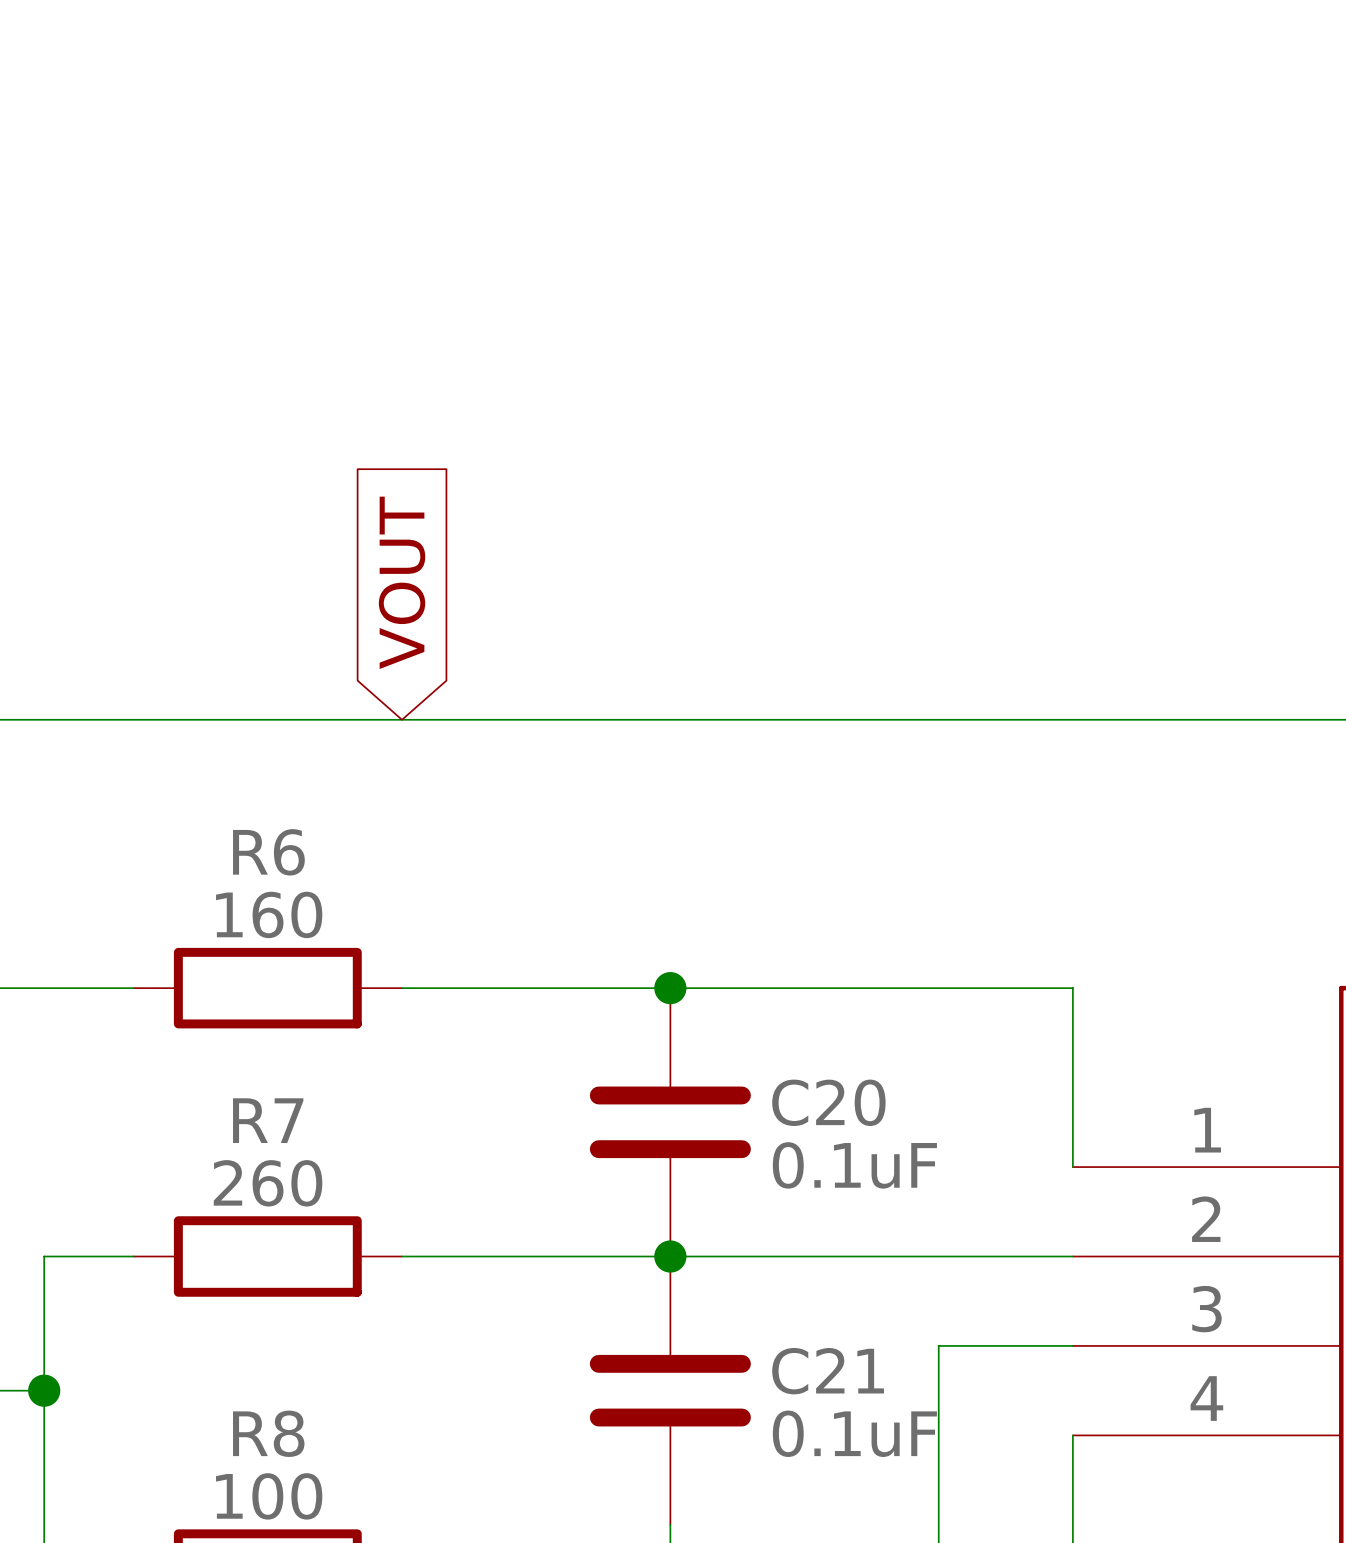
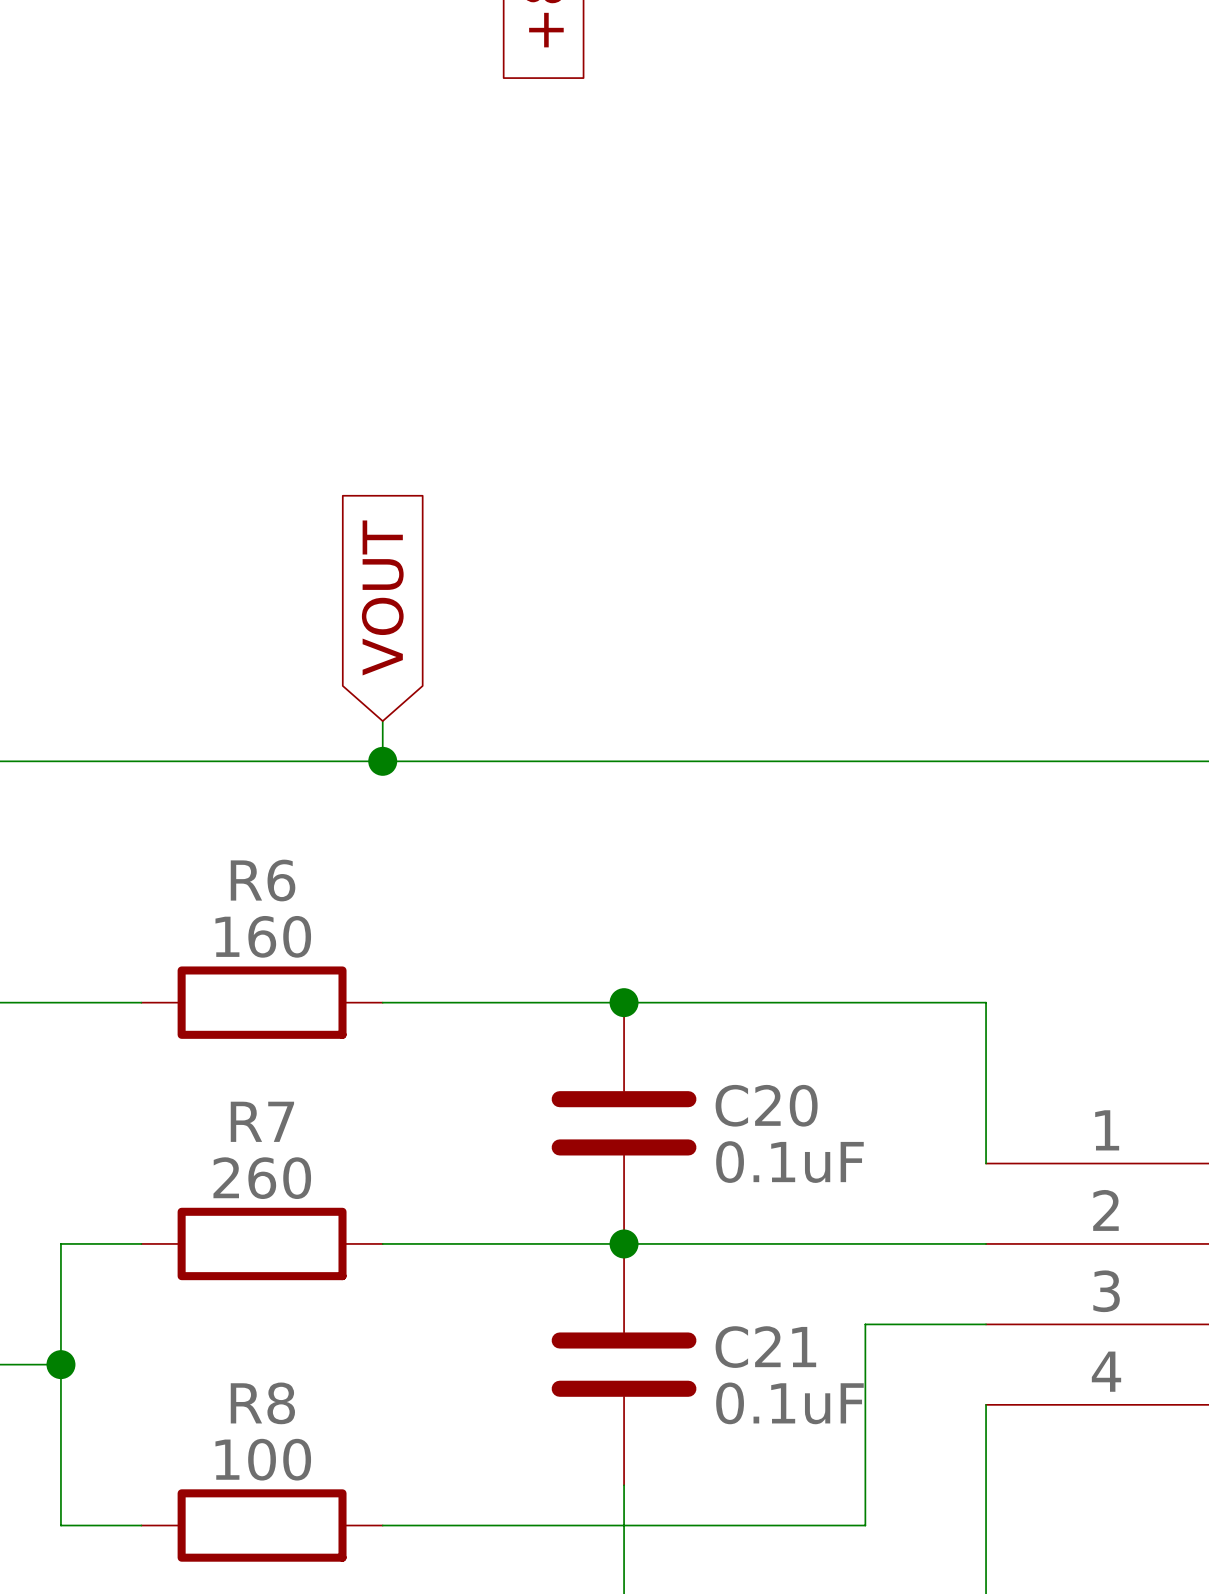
global label position: VOUT (402, 582) -> VOUT (382, 597)
wire: none -> (382, 721) (382, 761)
junction: none -> (382, 761)

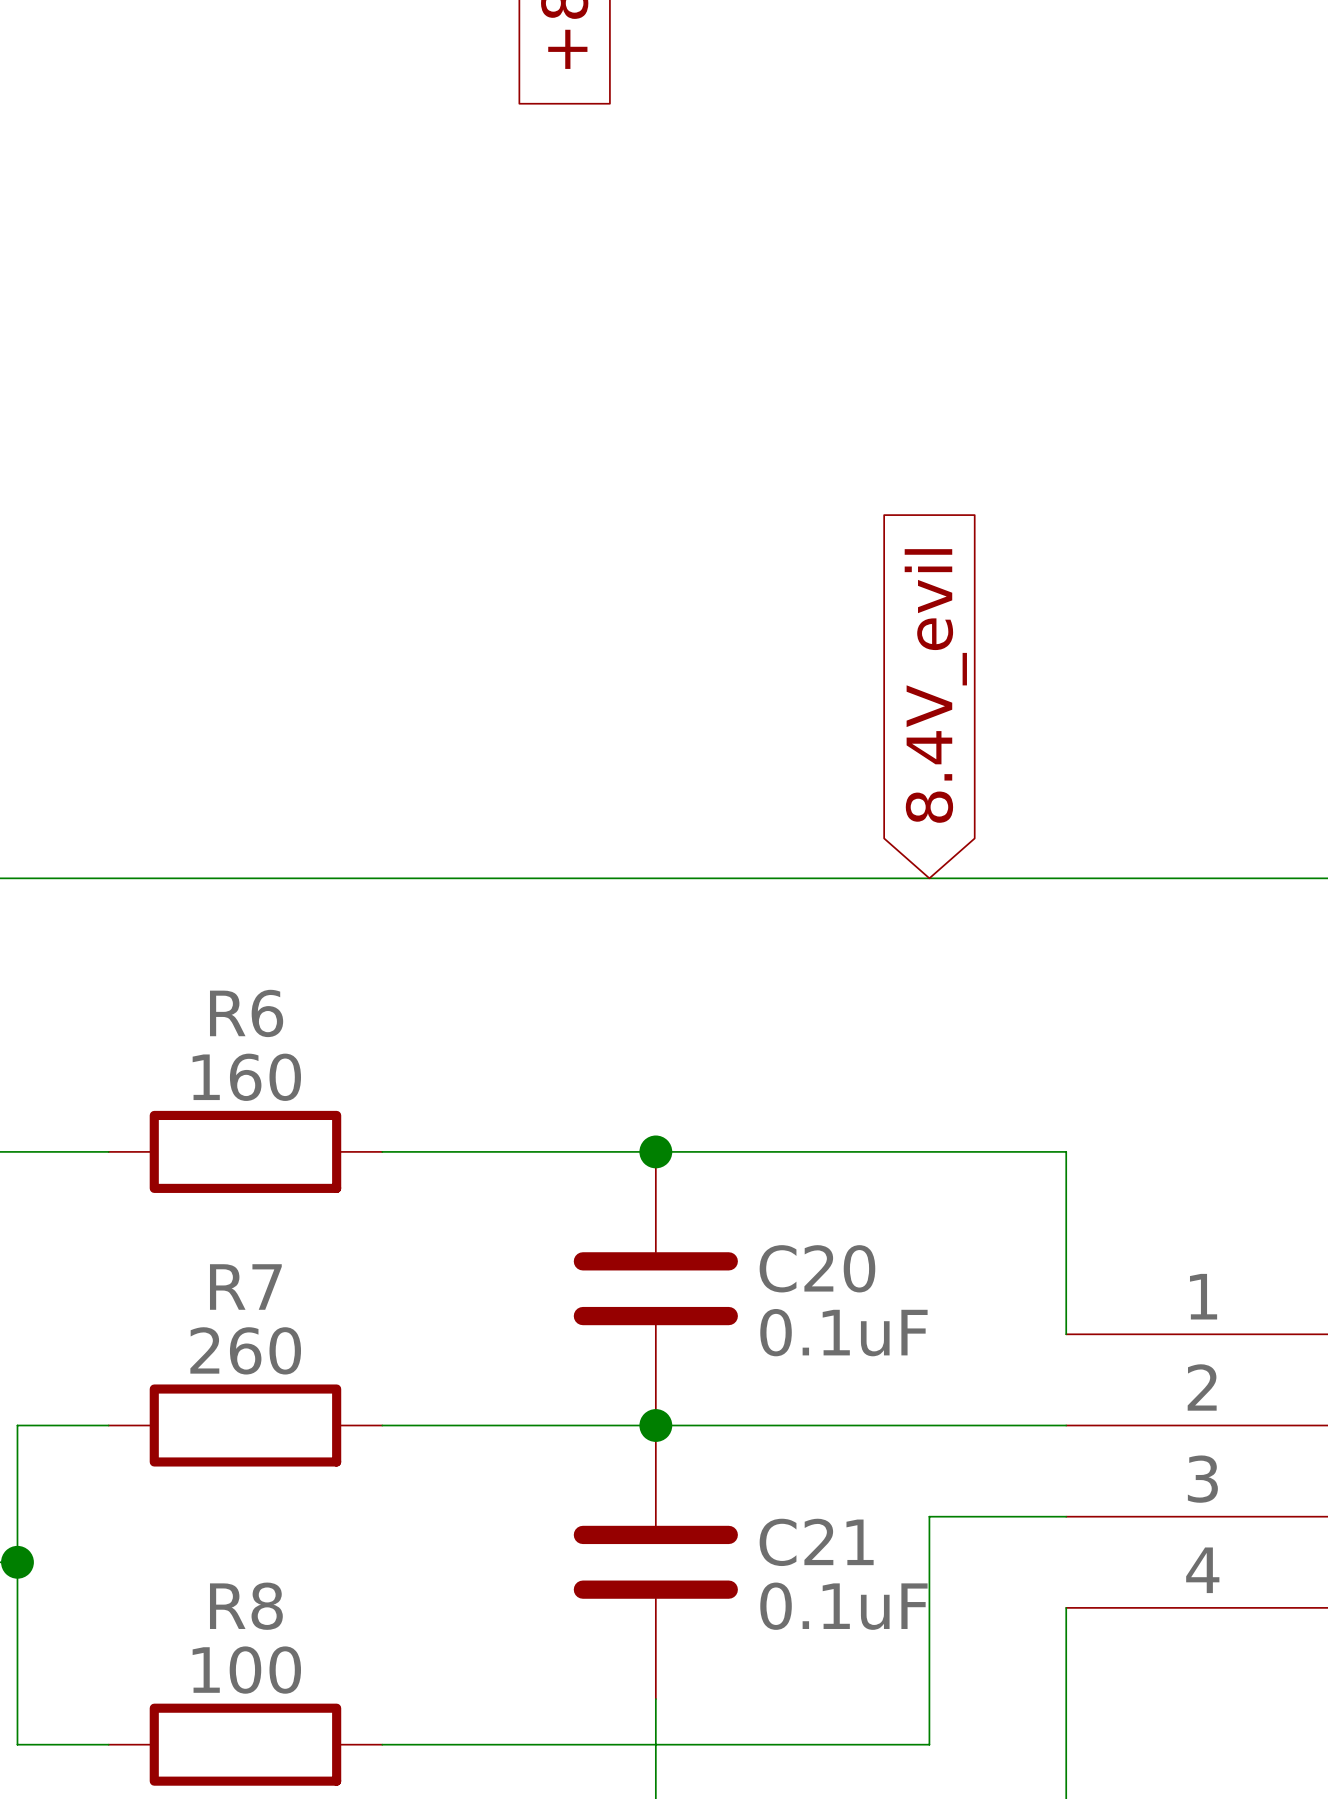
global label: none -> 8.4V_evil (935, 685)
global label: VOUT (382, 597) -> none
wire: (382, 721) (382, 761) -> none
junction: (382, 761) -> none

